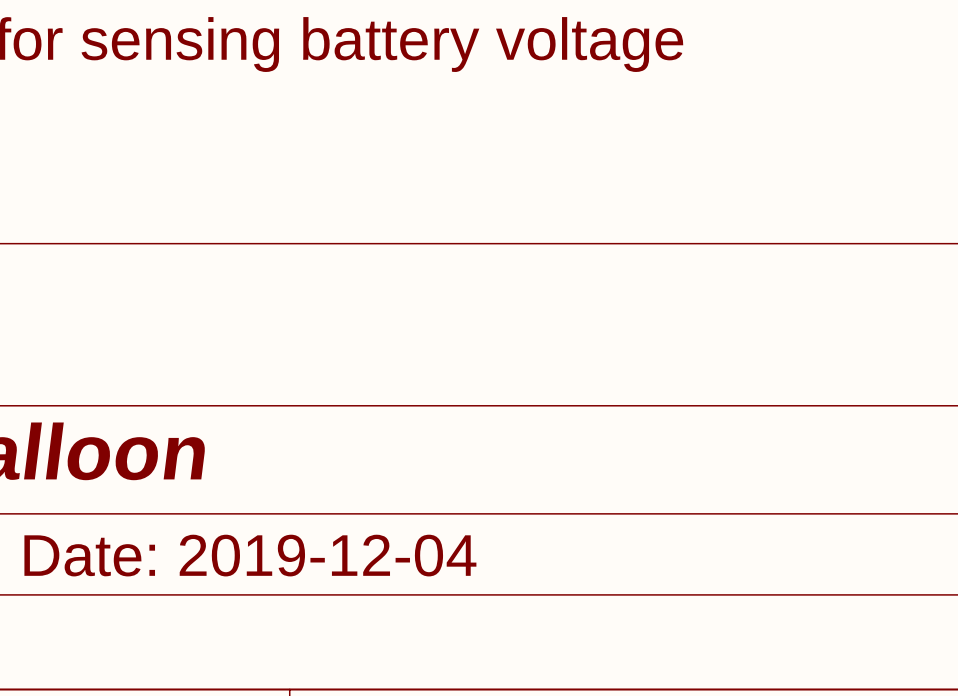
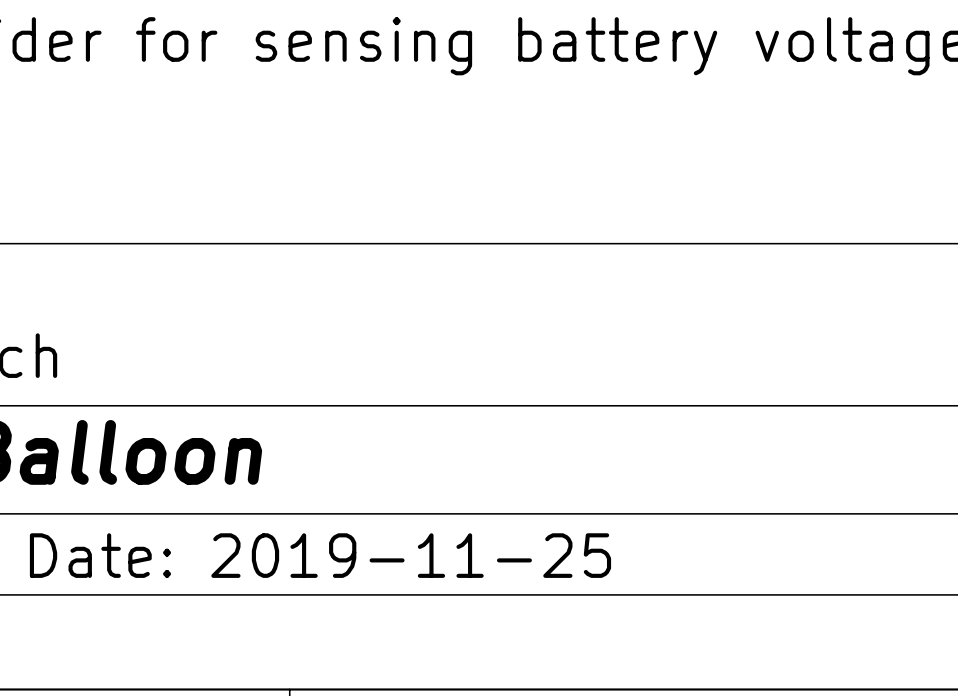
title block: Date: 2019-12-04 (250, 555) -> Date: 2019-11-25 (320, 555)

